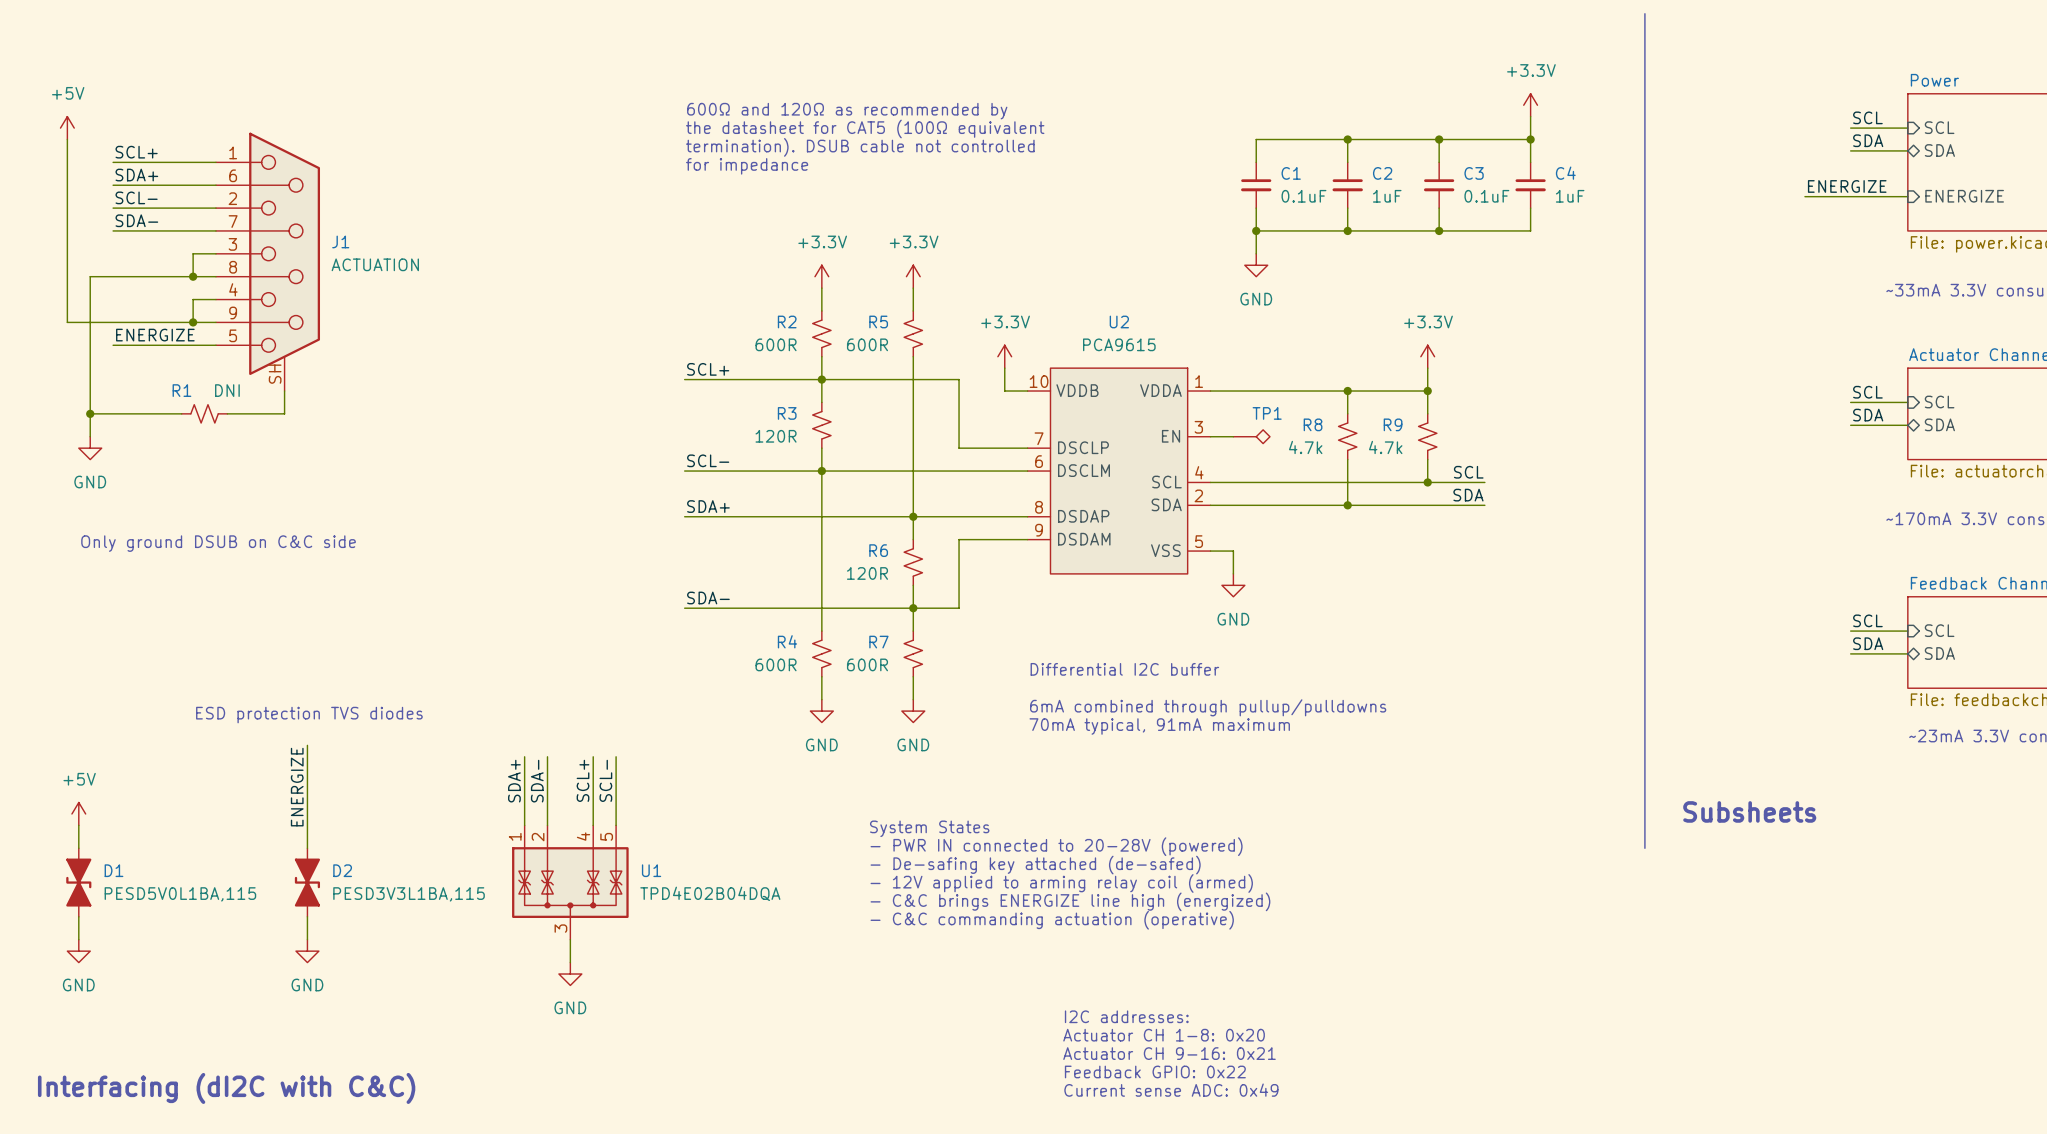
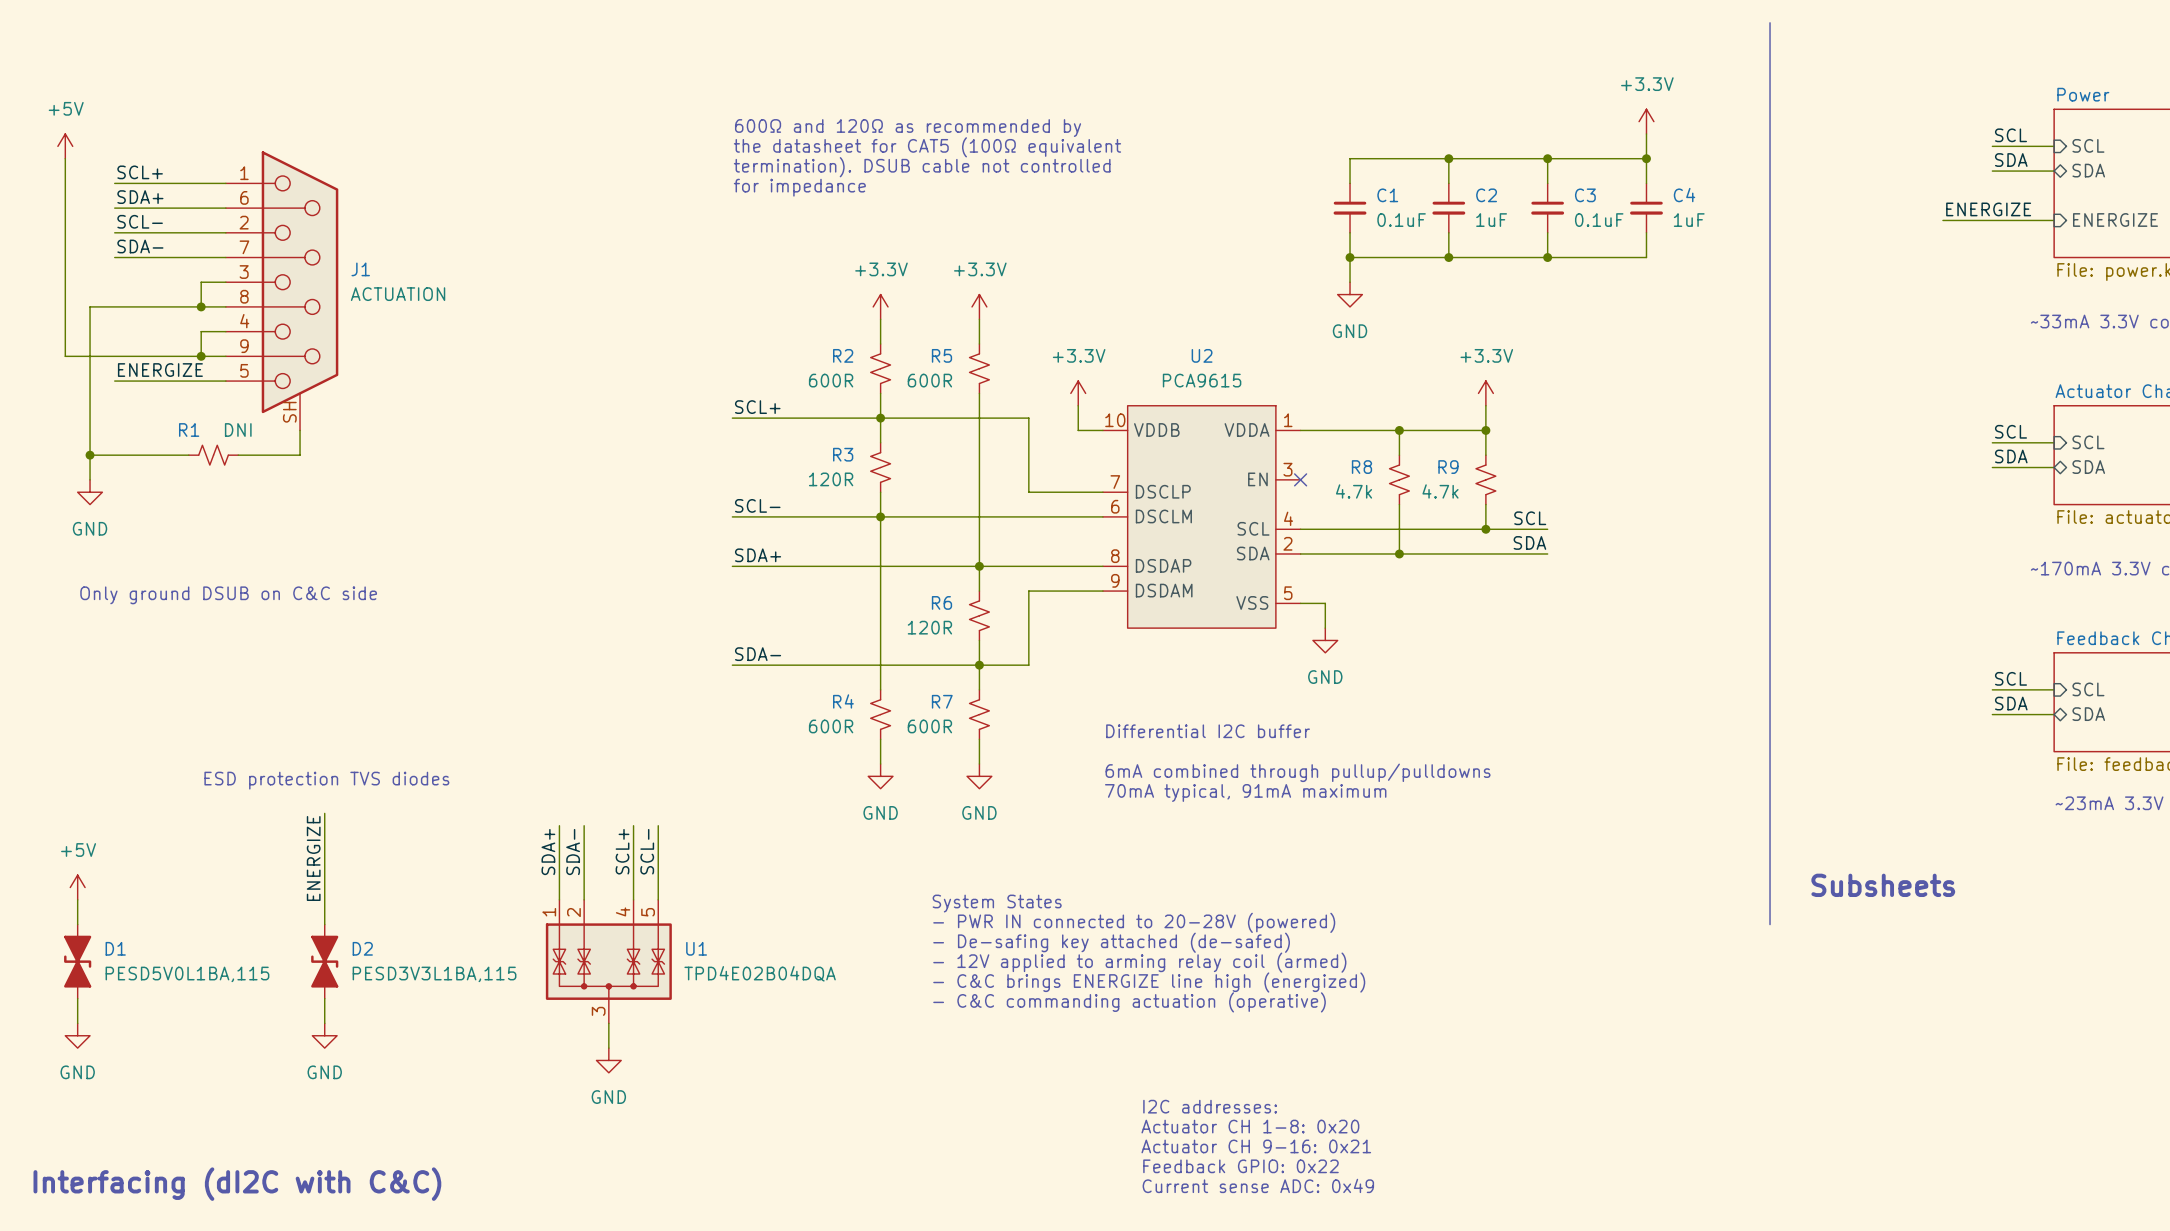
power symbol position: +3.3V (1427, 356) -> +3.3V (1485, 393)
wire: (1427, 368) (1427, 413) -> (1485, 405) (1485, 455)
junction: none -> (1399, 430)
wire: (1347, 391) (1347, 413) -> (1399, 430) (1399, 455)
junction: (1347, 391) -> none
wire: (1381, 391) (1427, 391) -> none
junction: none -> (1485, 430)
junction: (1427, 391) -> none
wire: (1210, 436) (1233, 436) -> none
no-connect mark: none -> (1300, 479)
TP1: (1251, 436) -> none
R8 position: (1347, 436) -> (1399, 479)
R9 position: (1427, 436) -> (1485, 479)
wire: (1347, 459) (1347, 505) -> (1399, 504) (1399, 553)
wire: (1427, 459) (1427, 482) -> (1485, 504) (1485, 529)
label position: SCL (1468, 472) -> SCL (1530, 518)
junction: none -> (1485, 529)
junction: (1427, 482) -> none
wire: (1439, 482) (1484, 482) -> none
label position: SDA (1468, 495) -> SDA (1529, 542)
junction: none -> (1399, 553)
junction: (1347, 505) -> none
wire: (1439, 505) (1484, 505) -> none

